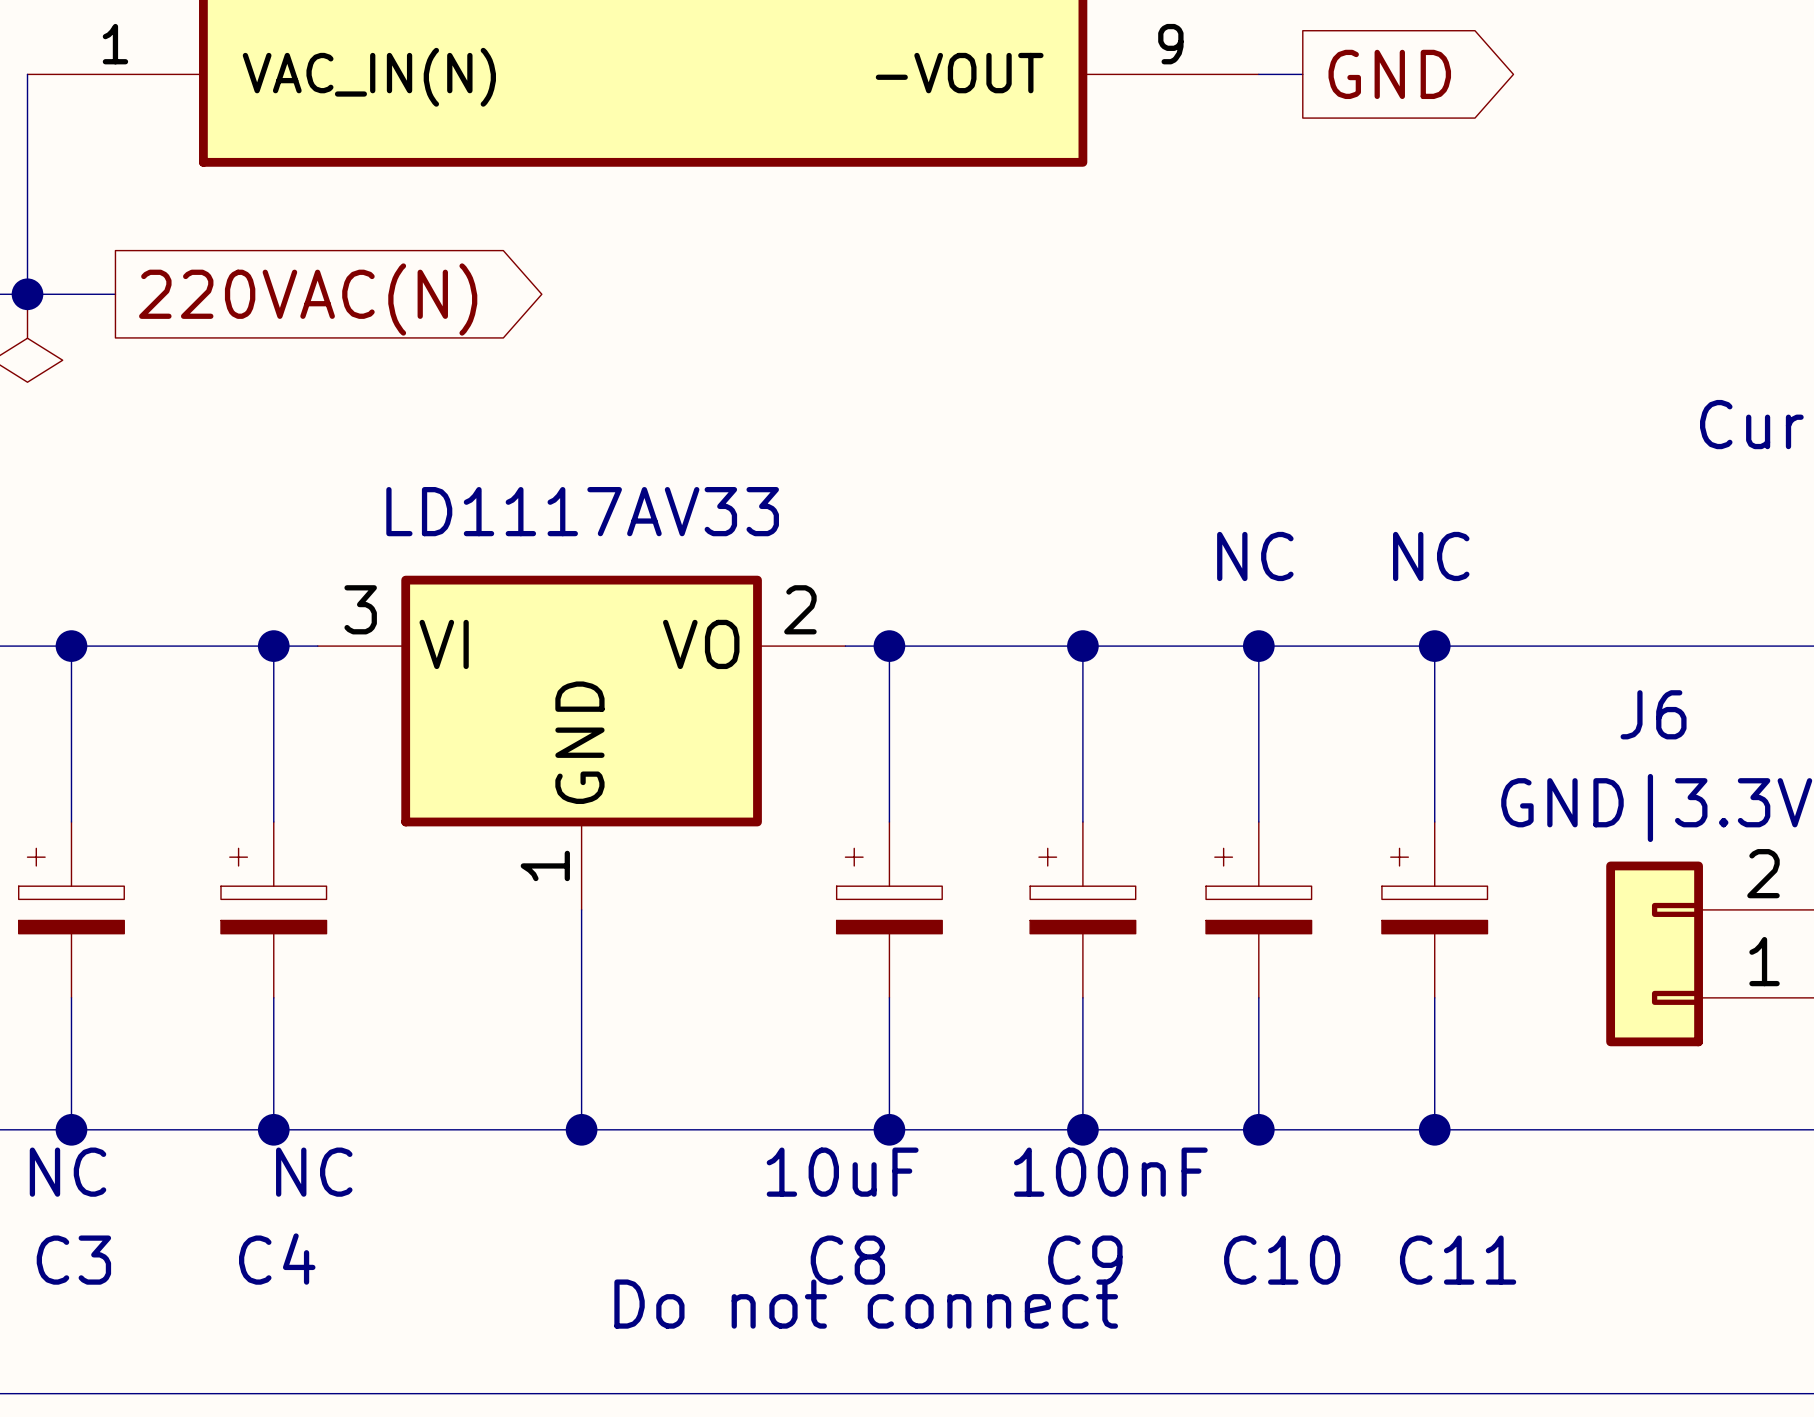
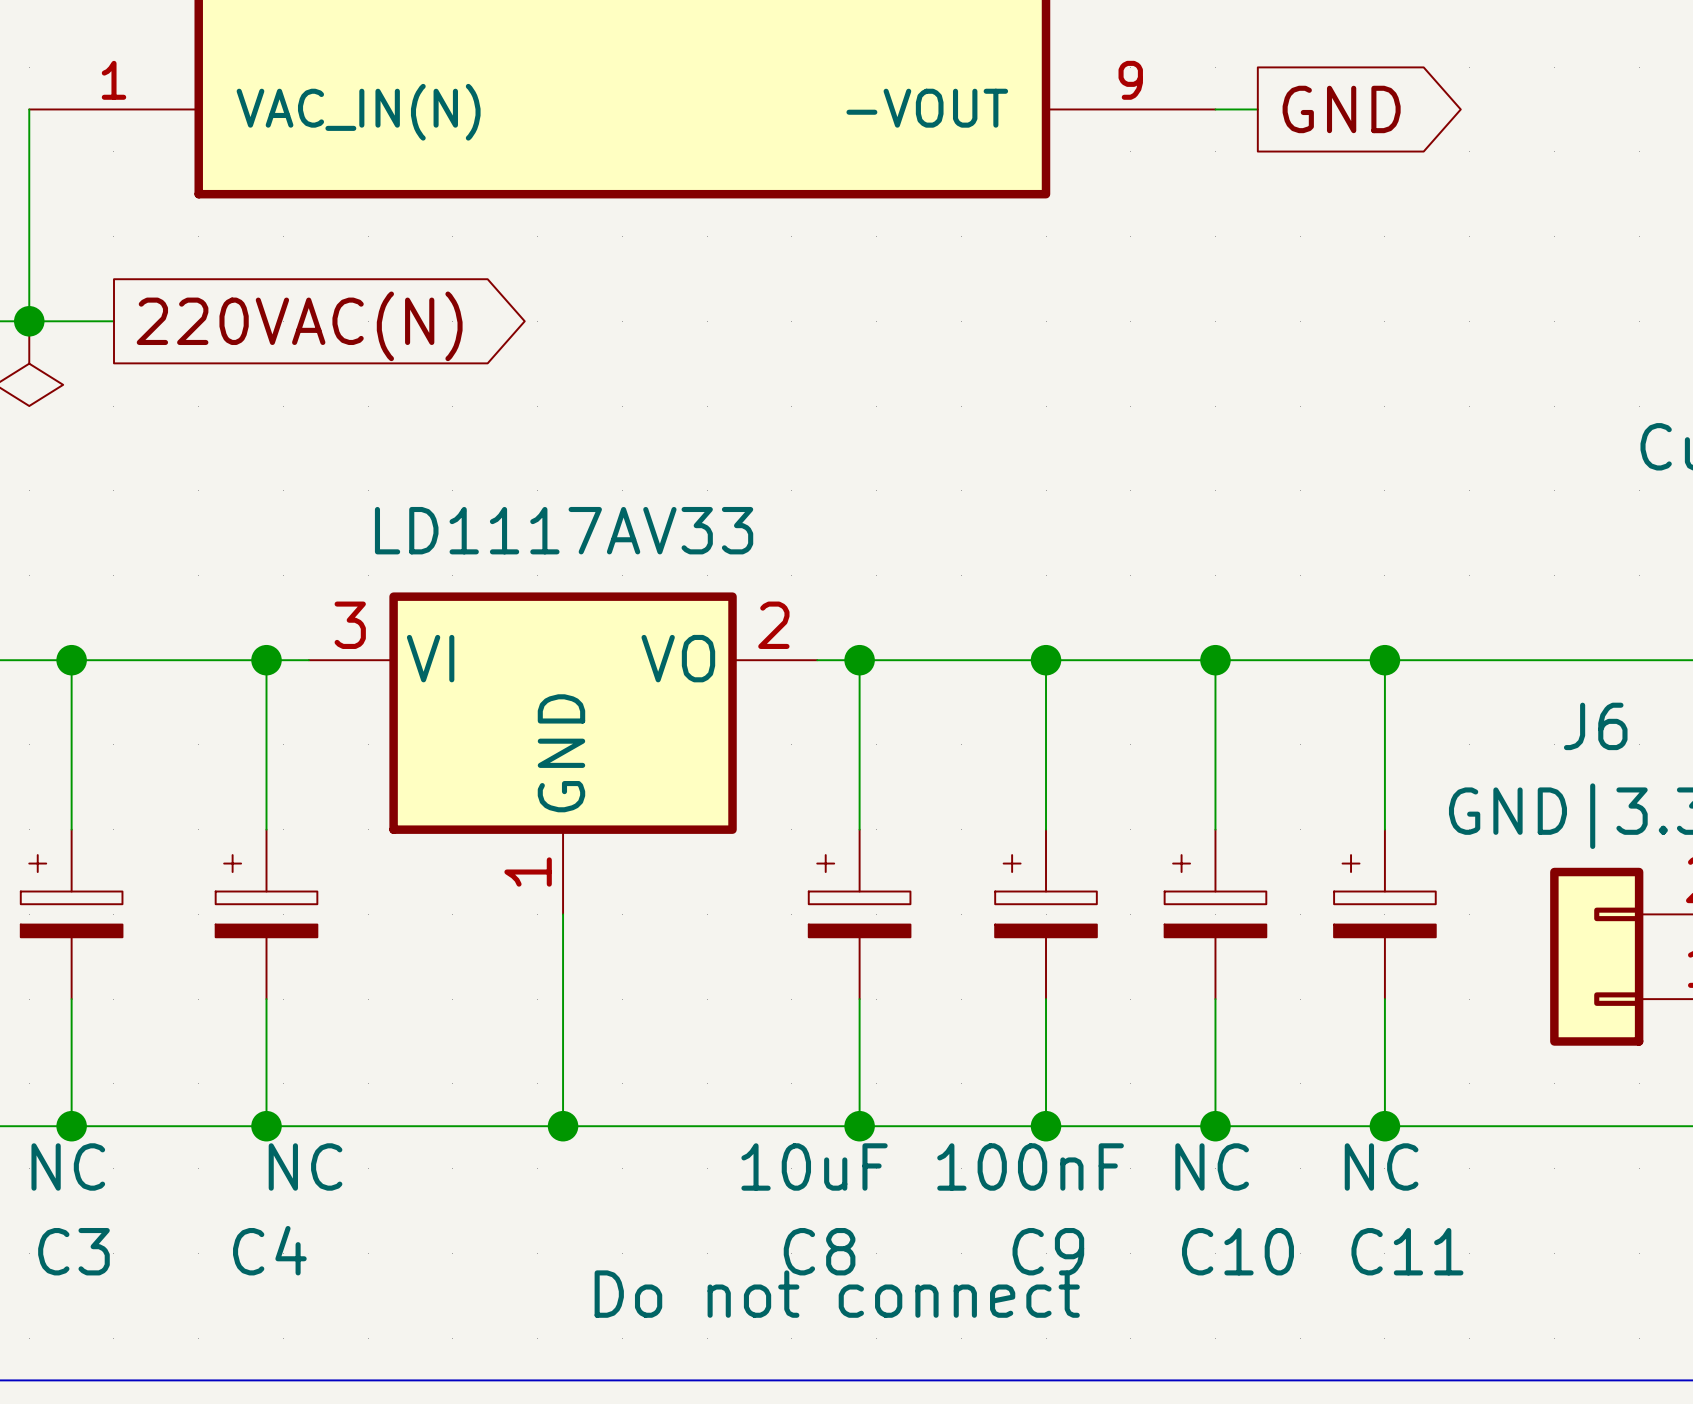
C10 value position: NC (1255, 556) -> NC (1212, 1166)
C11 value position: NC (1431, 556) -> NC (1381, 1166)
C9 value position: 100nF (1110, 1172) -> 100nF (1030, 1166)

